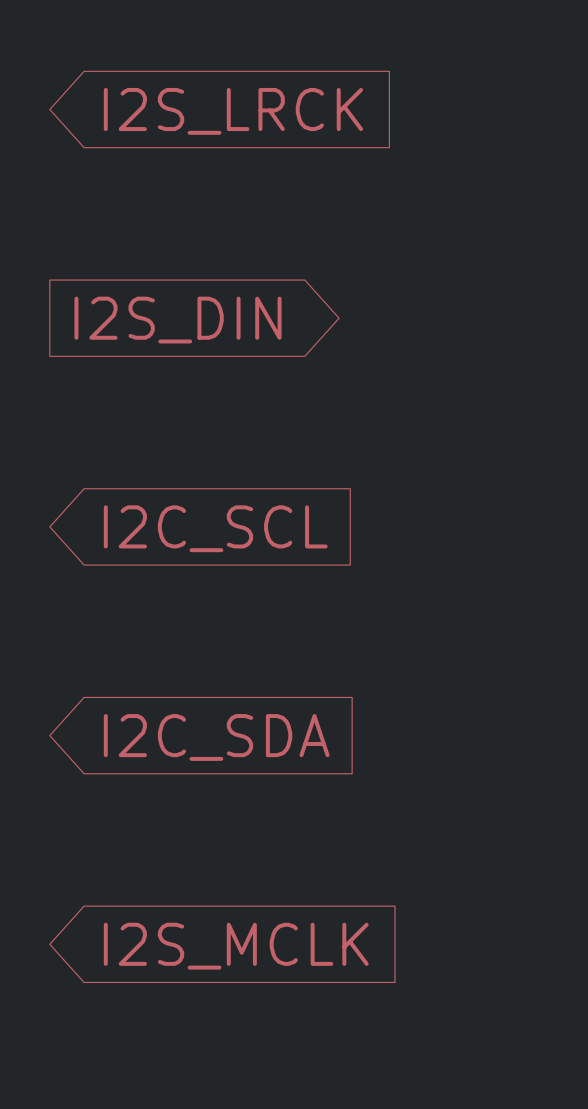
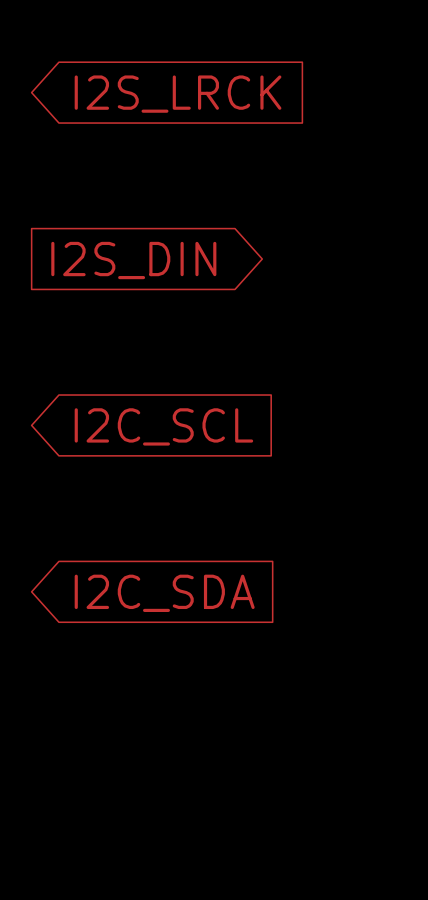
global label: I2S_MCLK (236, 946) -> none

